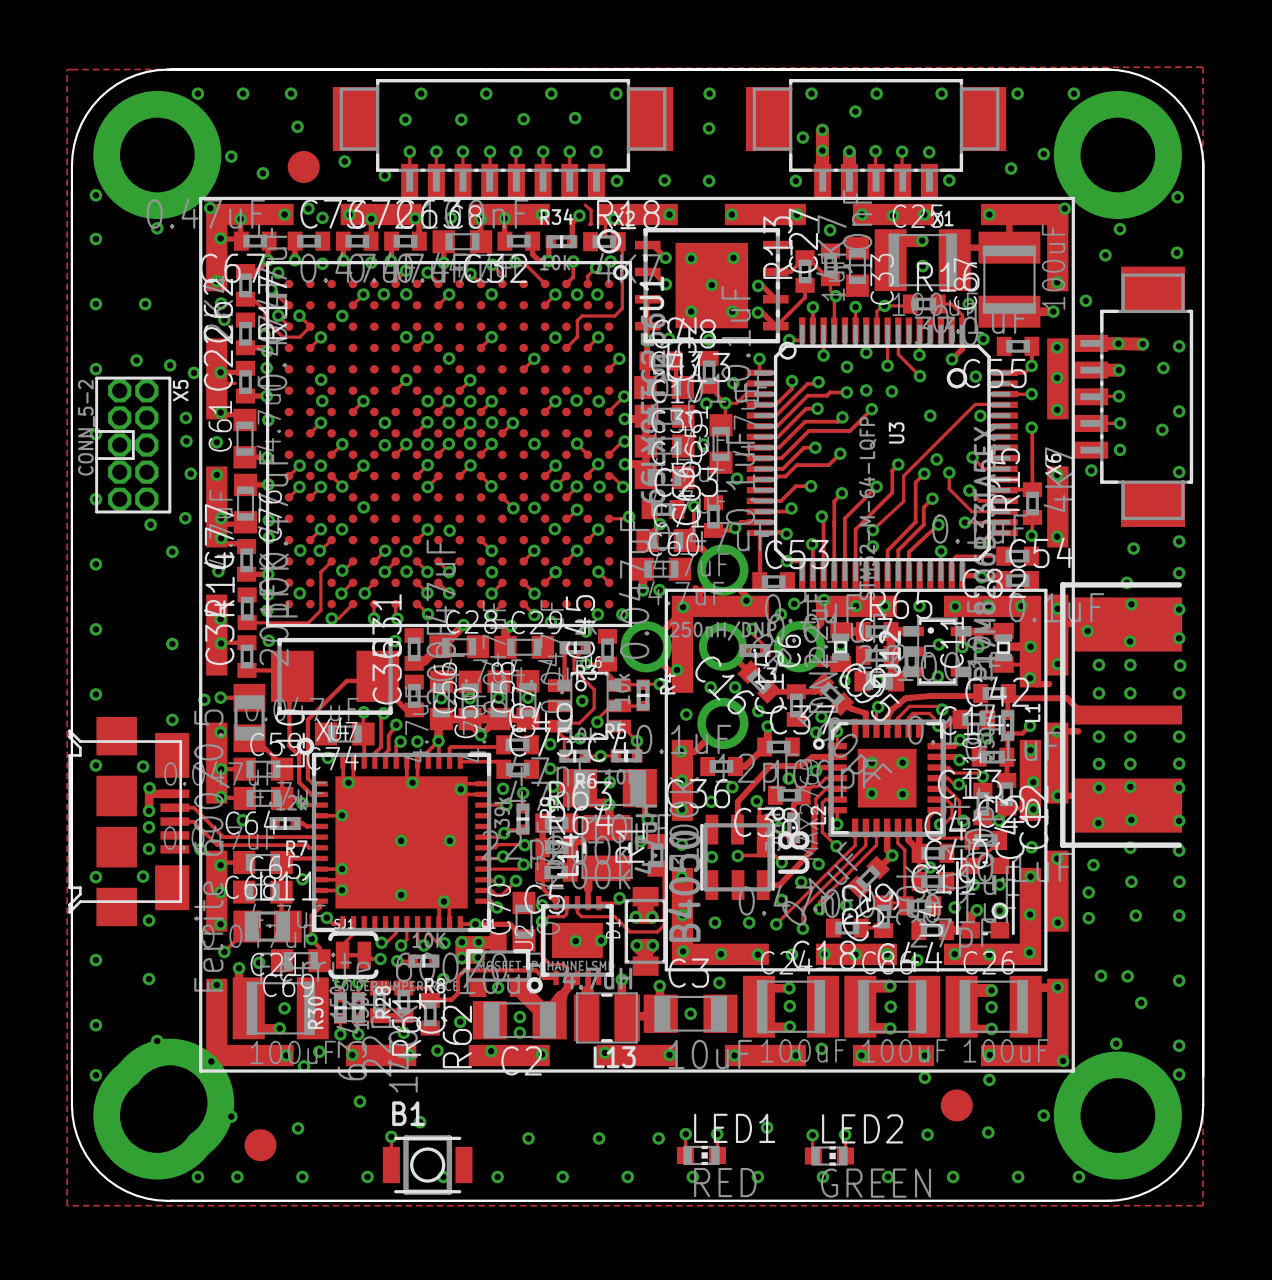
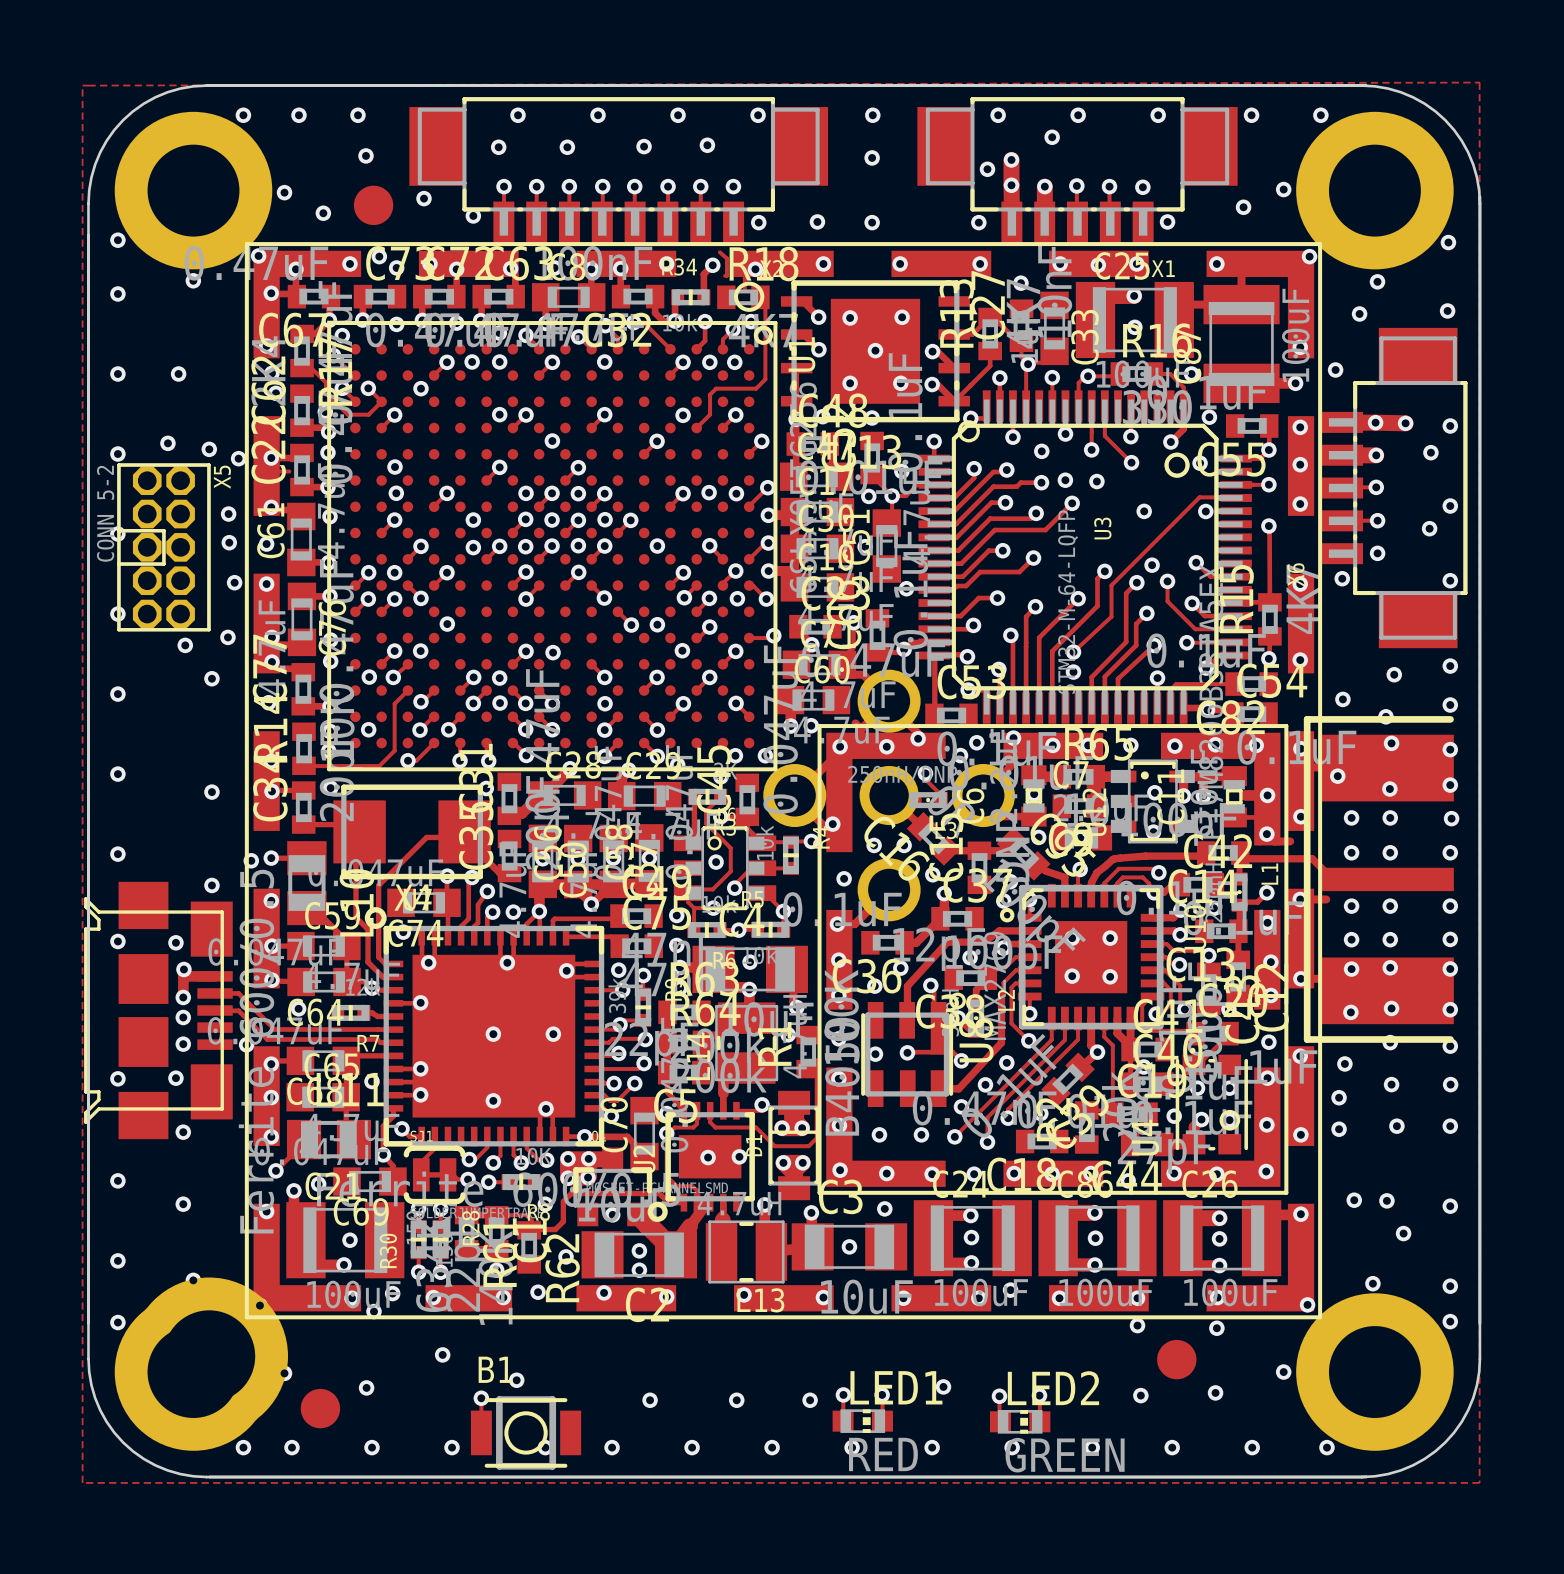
via: none -> (1342, 699)
via: none -> (886, 746)

